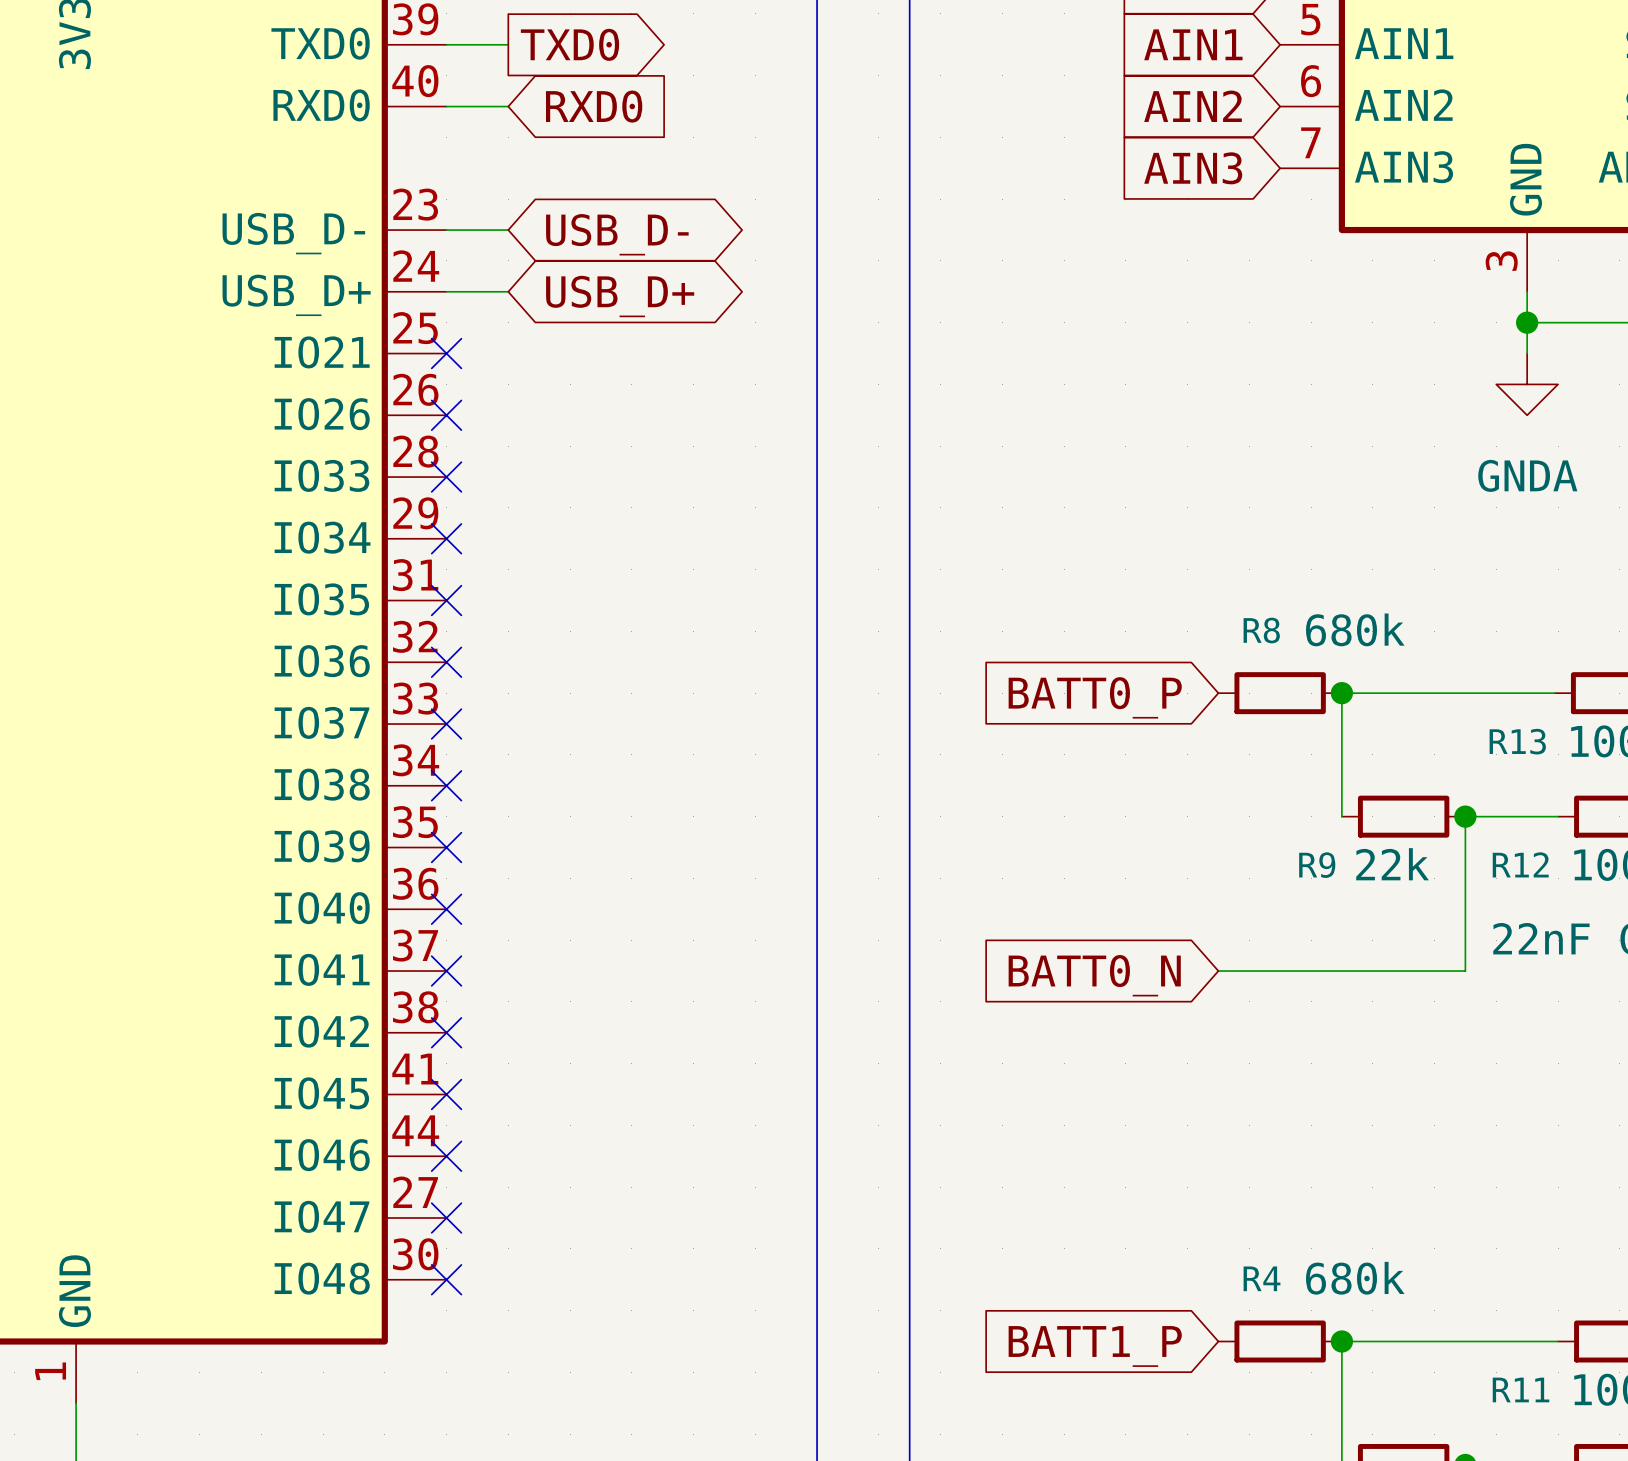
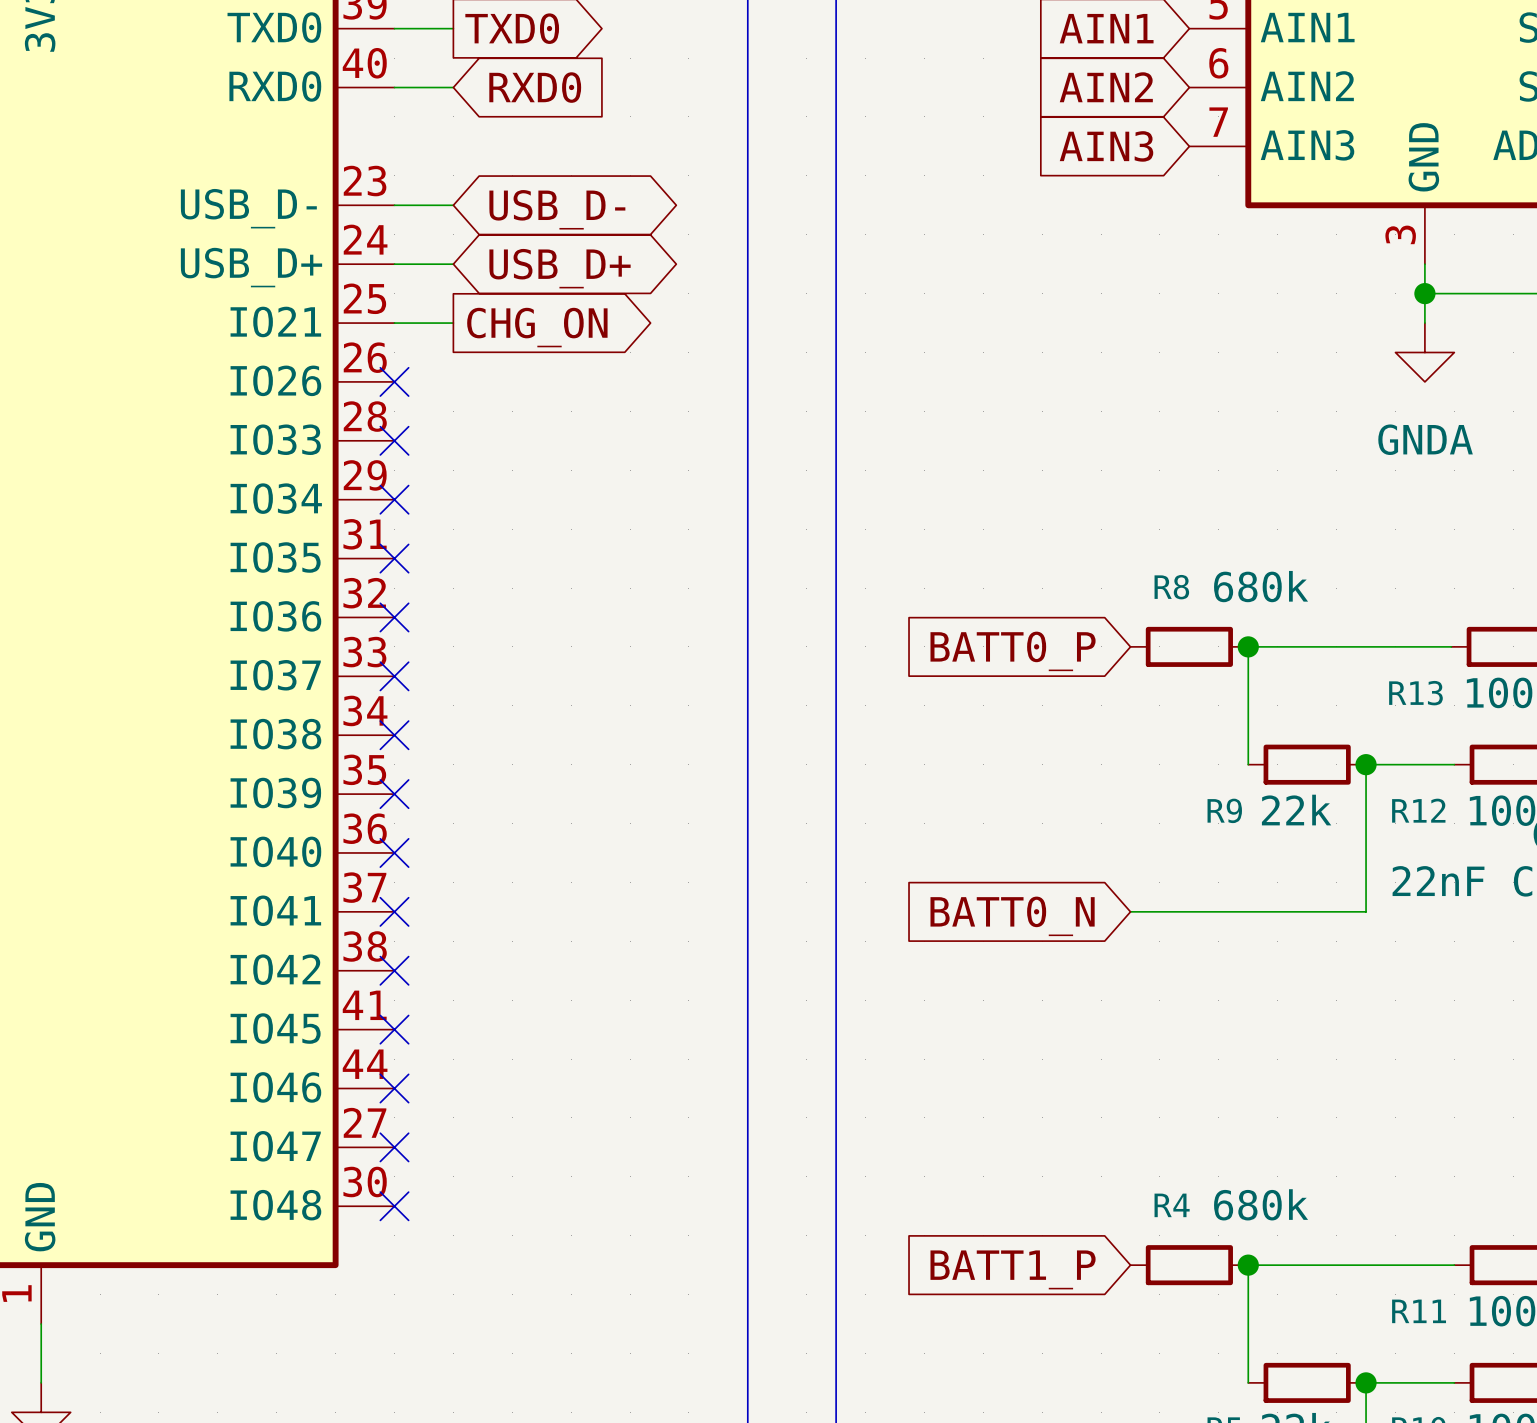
wire: none -> (394, 323) (453, 323)
no-connect mark: (446, 353) -> none
global label: none -> CHG_ON (537, 327)

